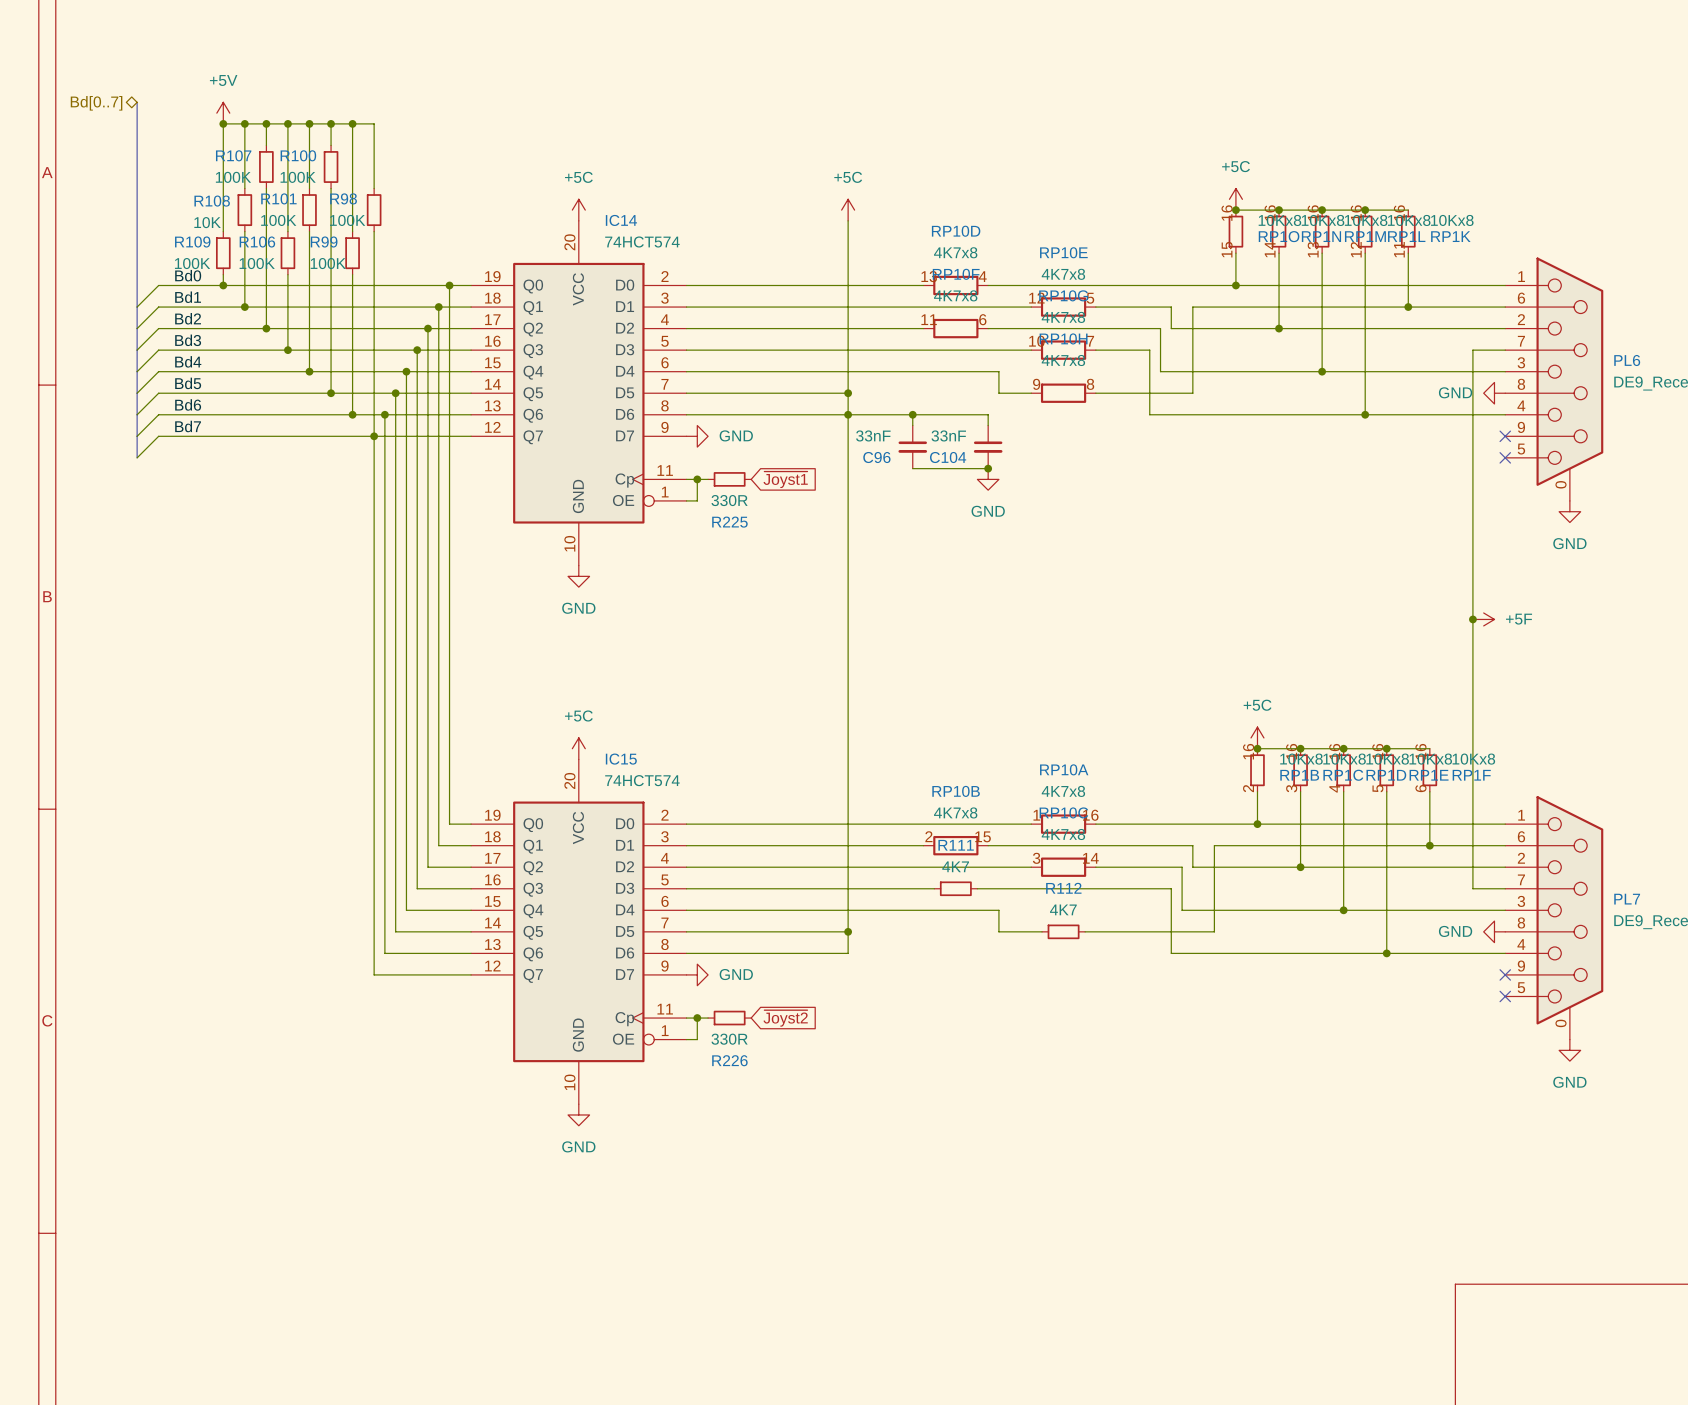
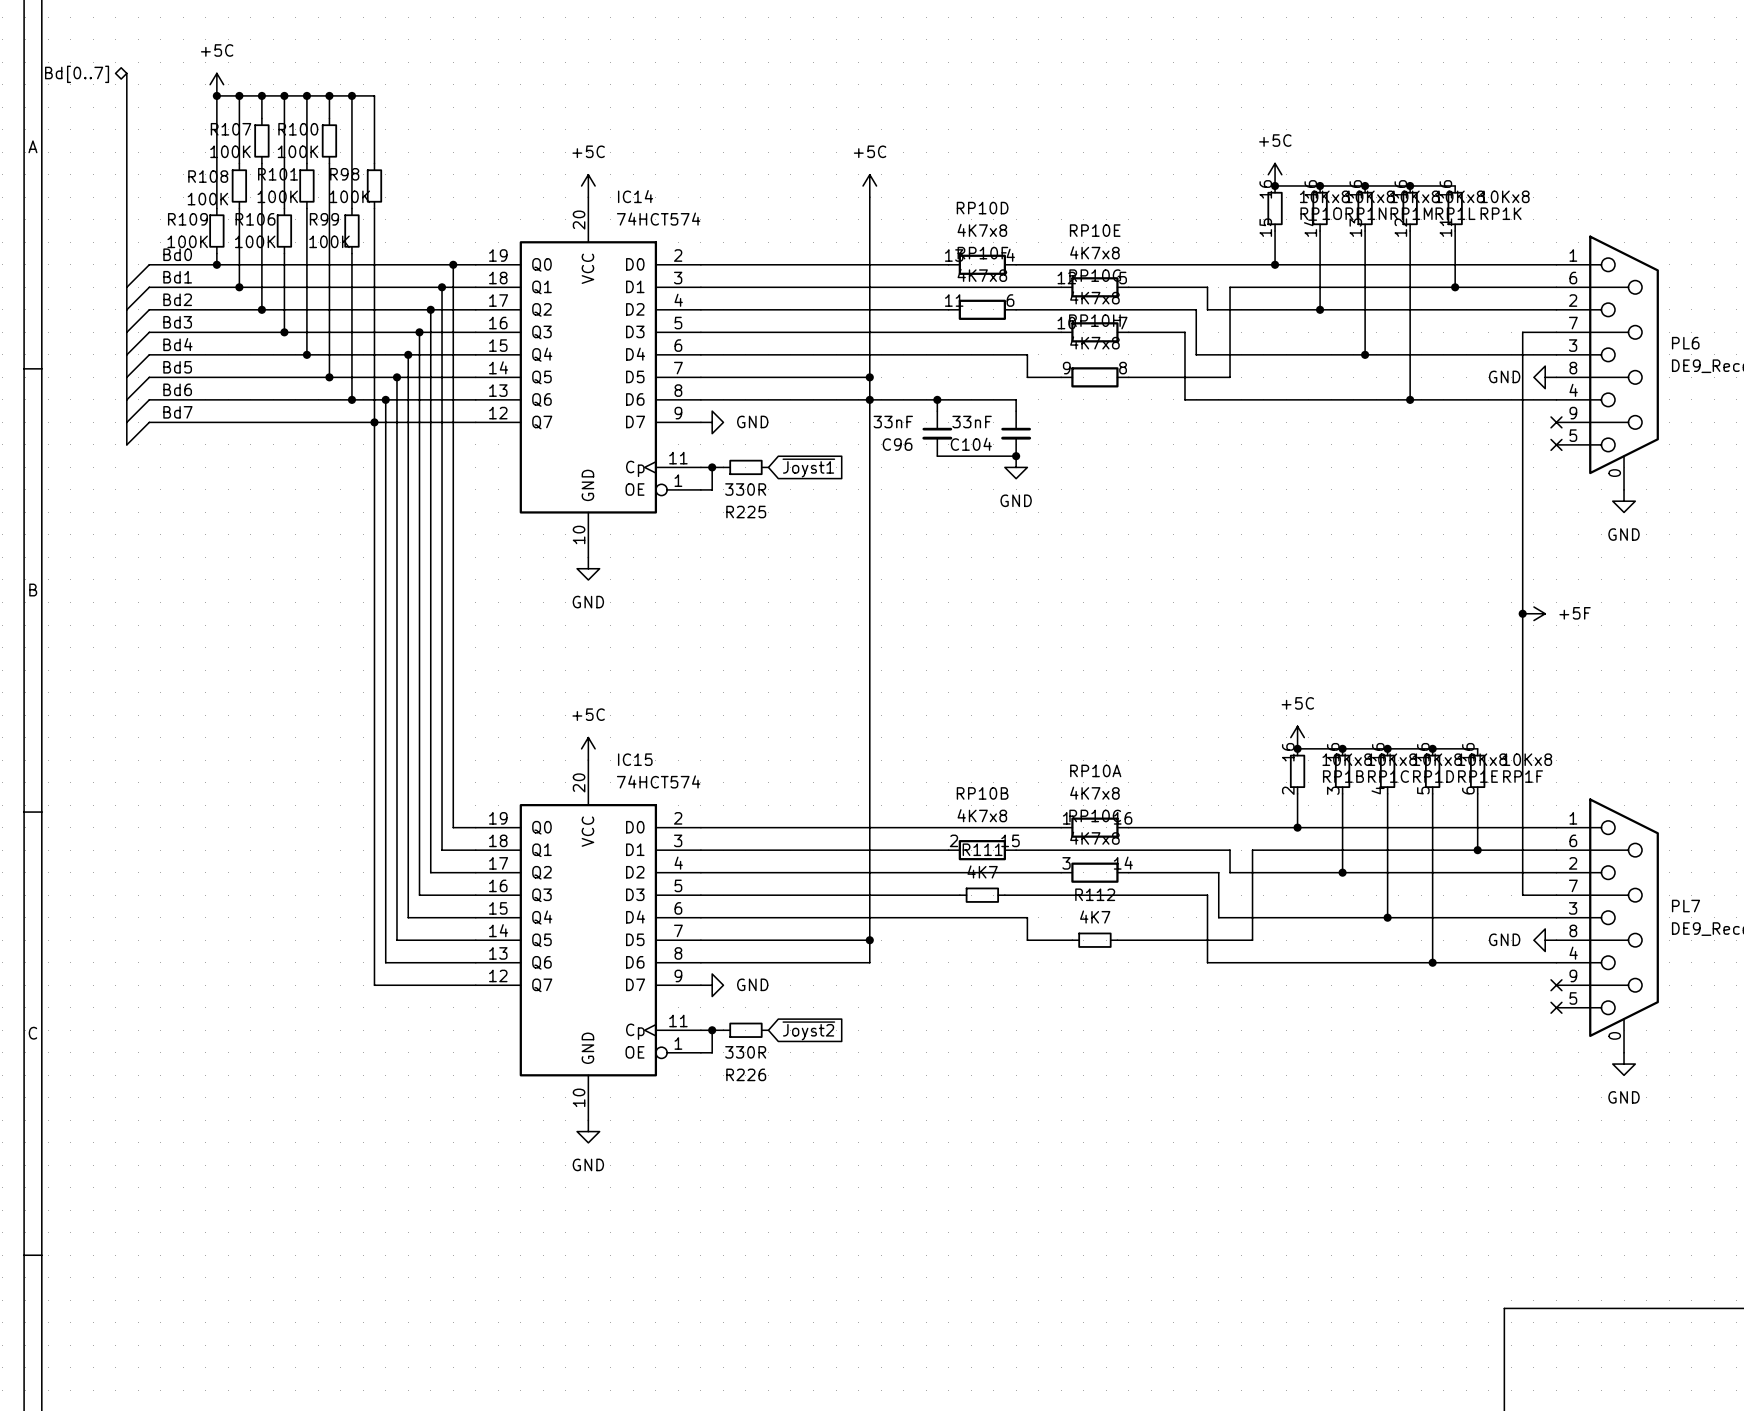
power symbol: +5V (223, 113) -> +5C (216, 84)
R108 value: 10K (207, 222) -> 100K (207, 199)

